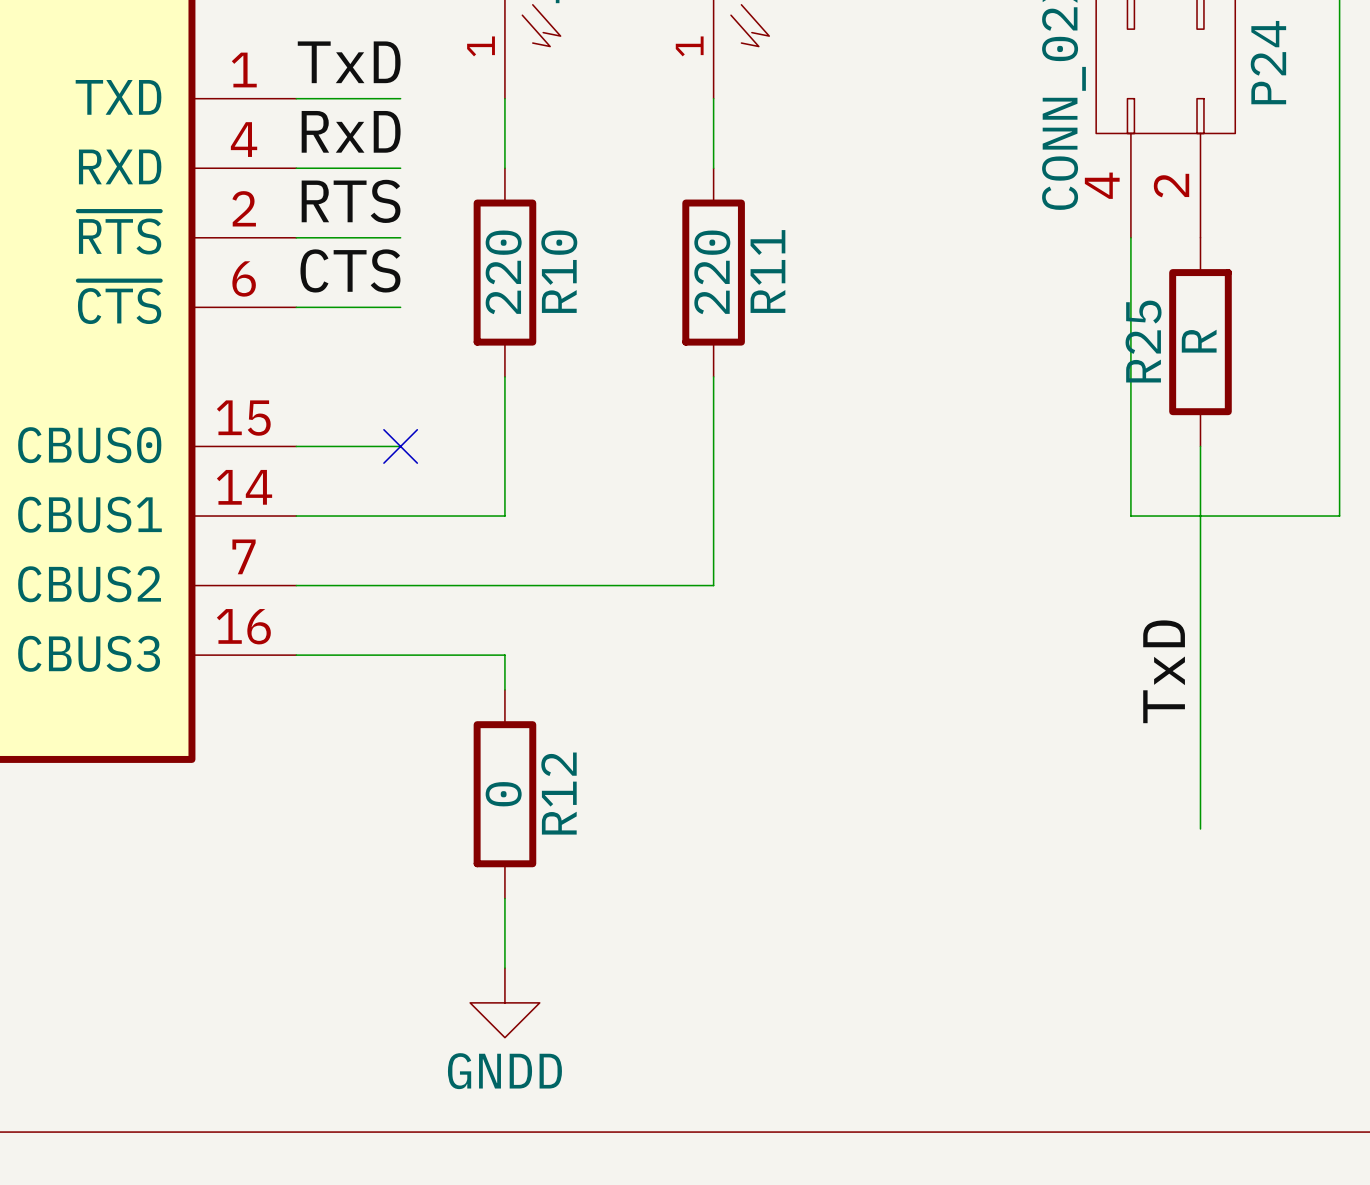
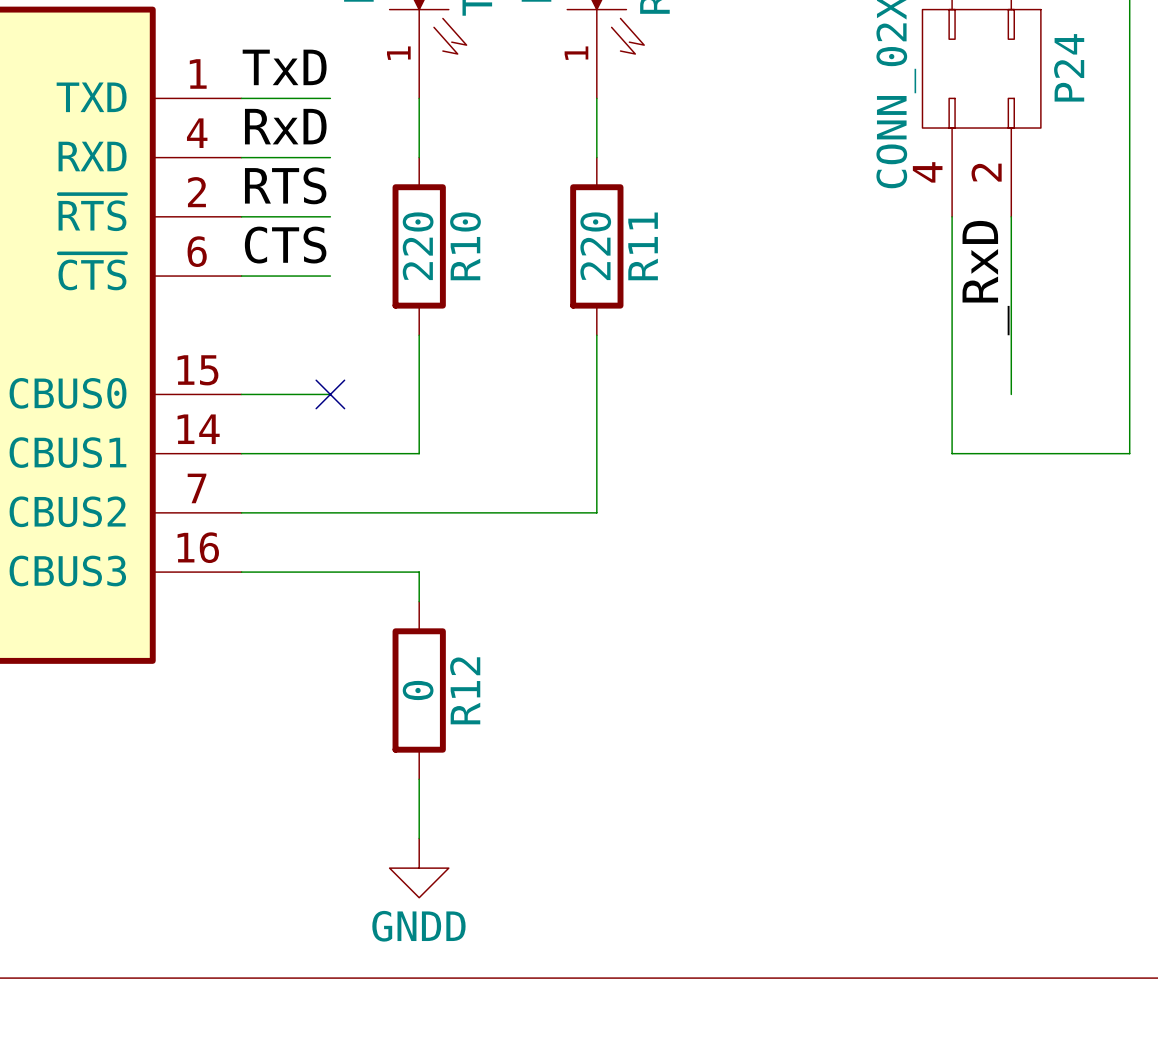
label: none -> _RxD (986, 278)
R25: R (1200, 342) -> none
wire: (1200, 446) (1200, 829) -> (1011, 394) (1011, 216)
label: TxD (1164, 671) -> none

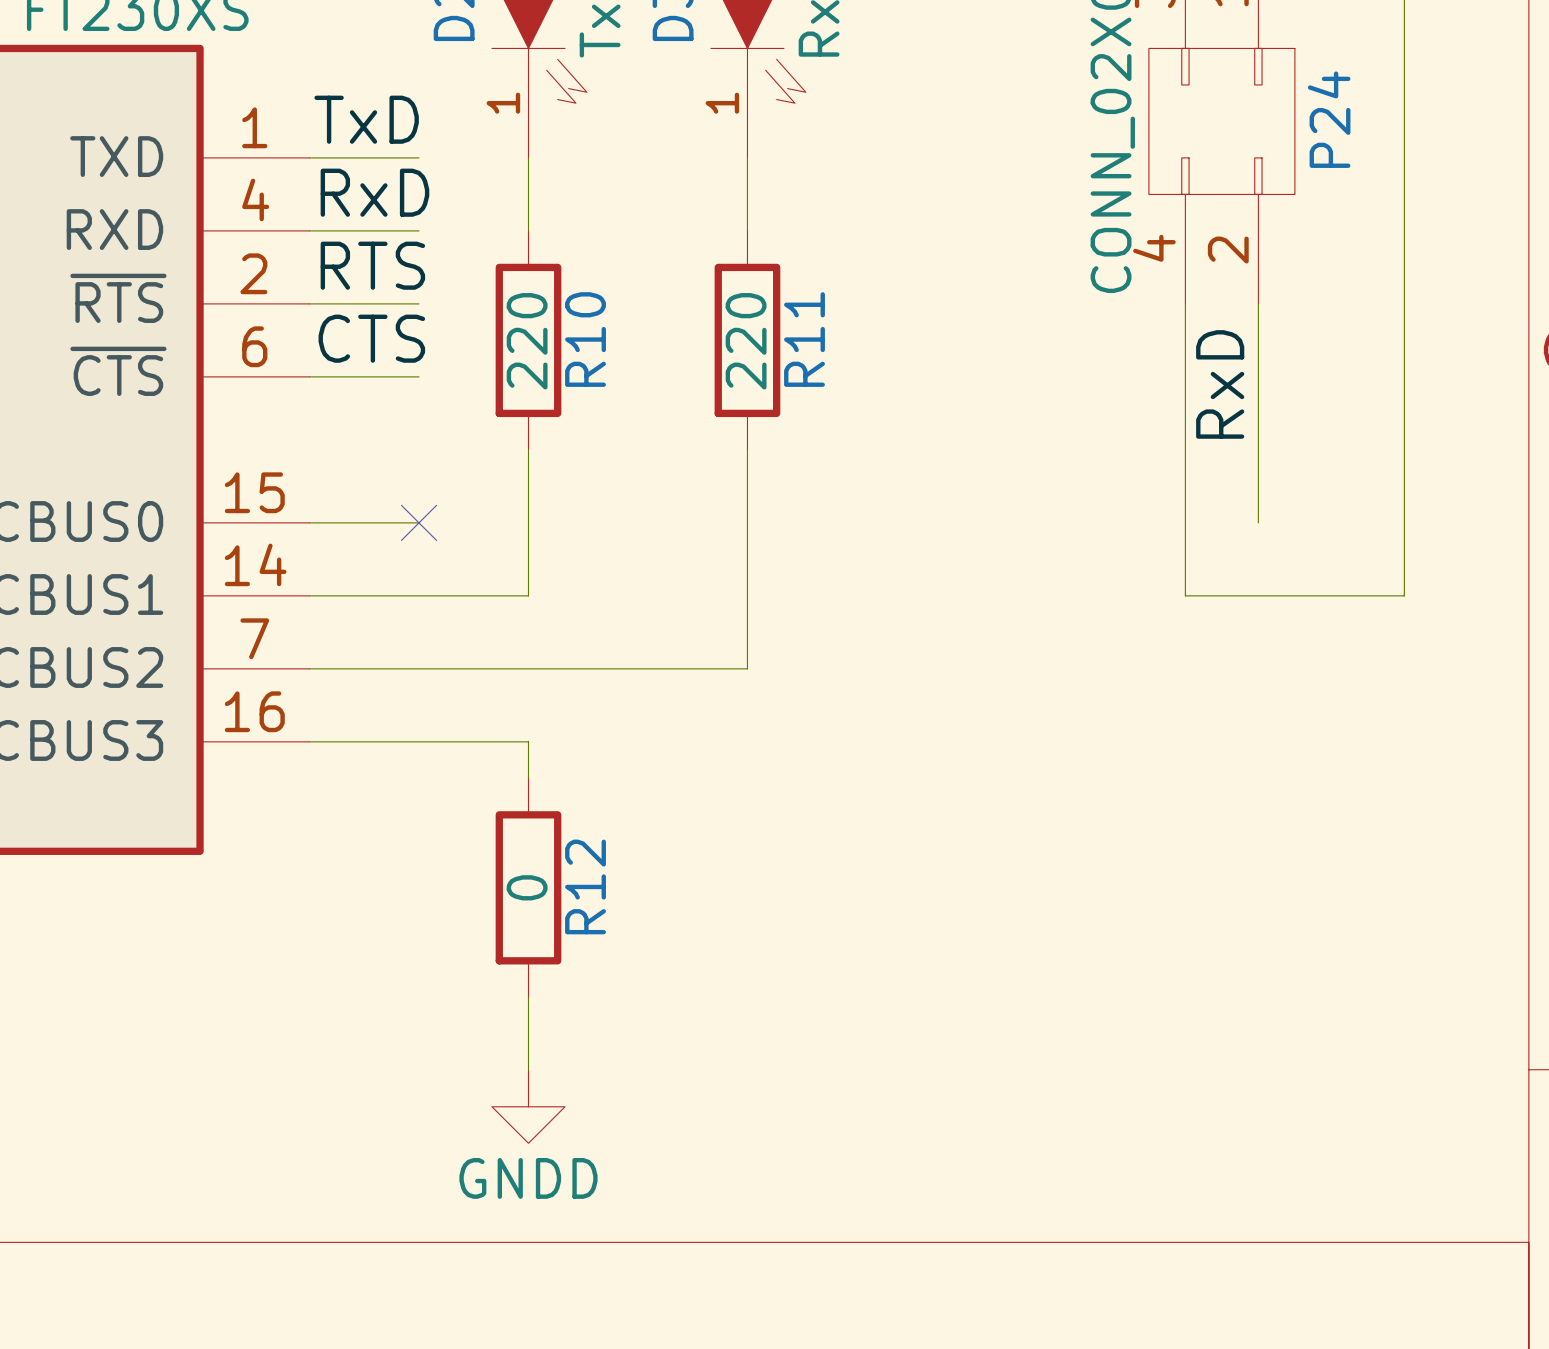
label: _RxD (986, 278) -> RxD (1220, 384)

